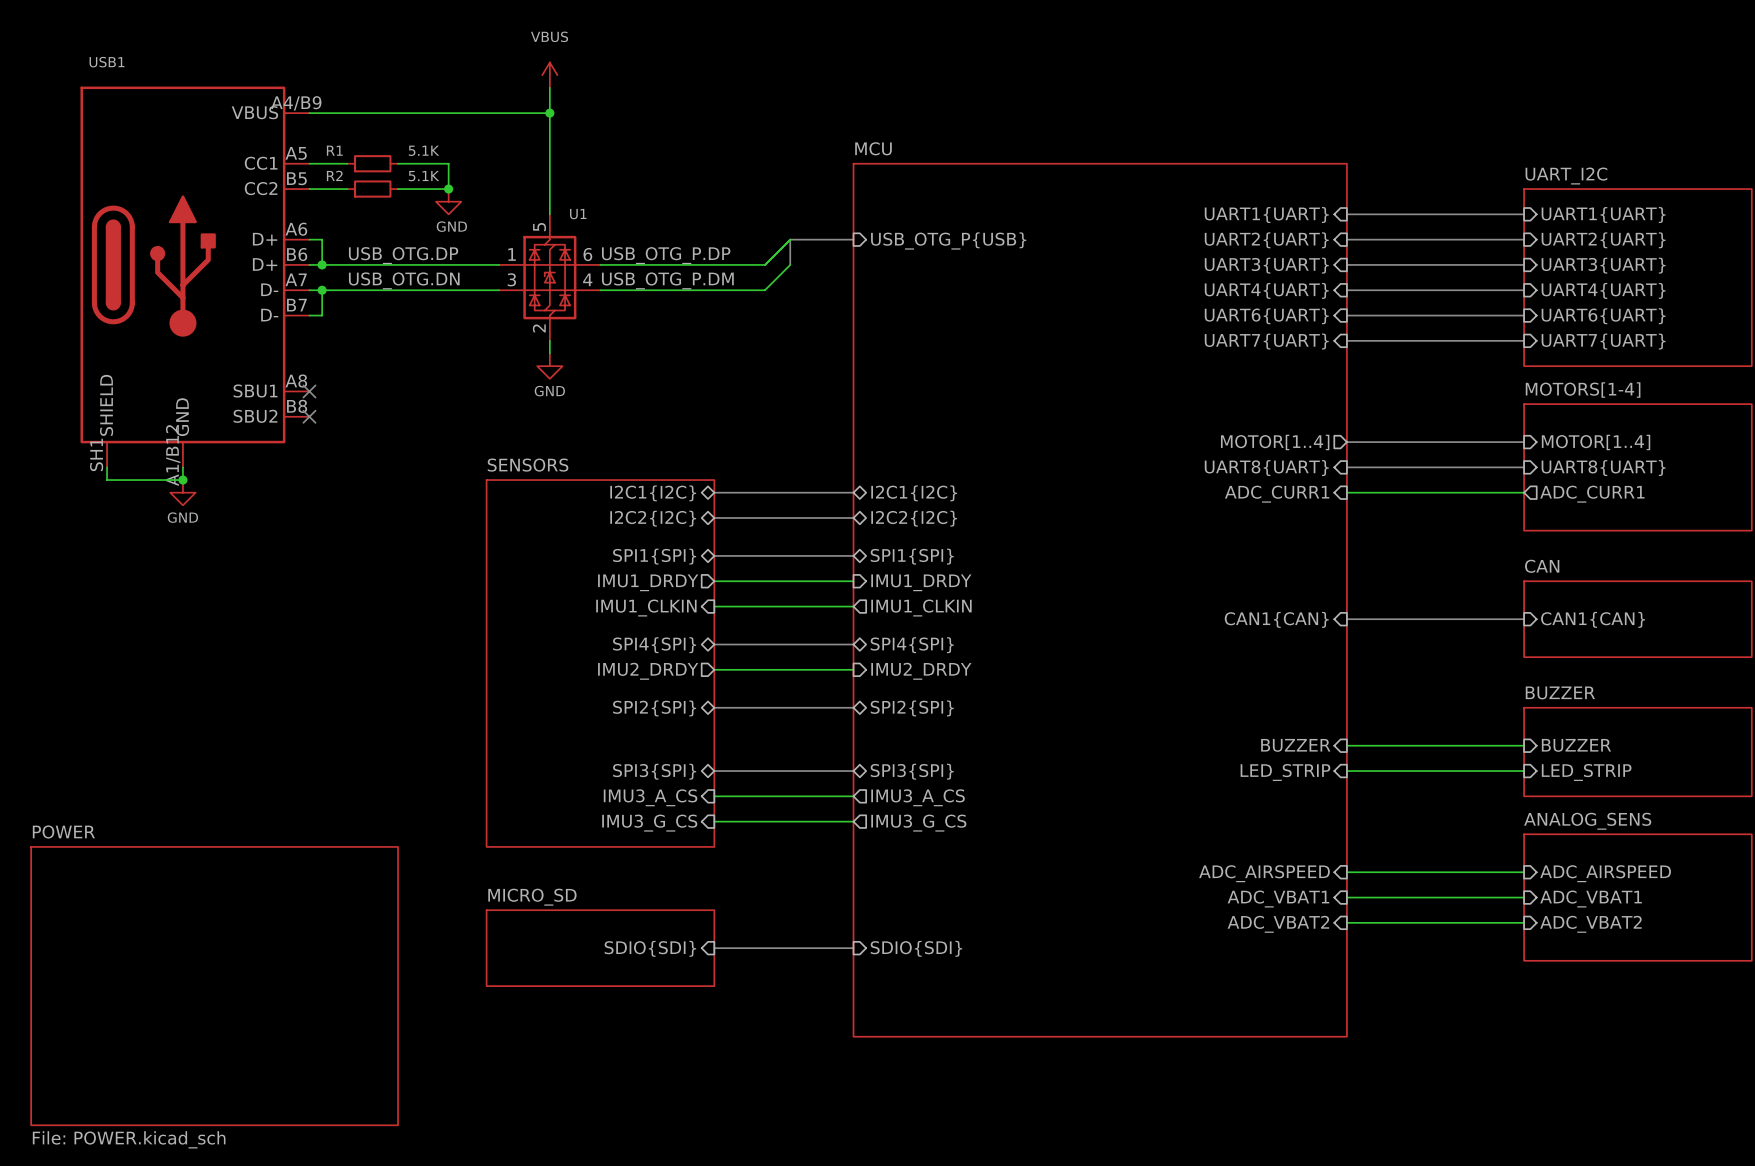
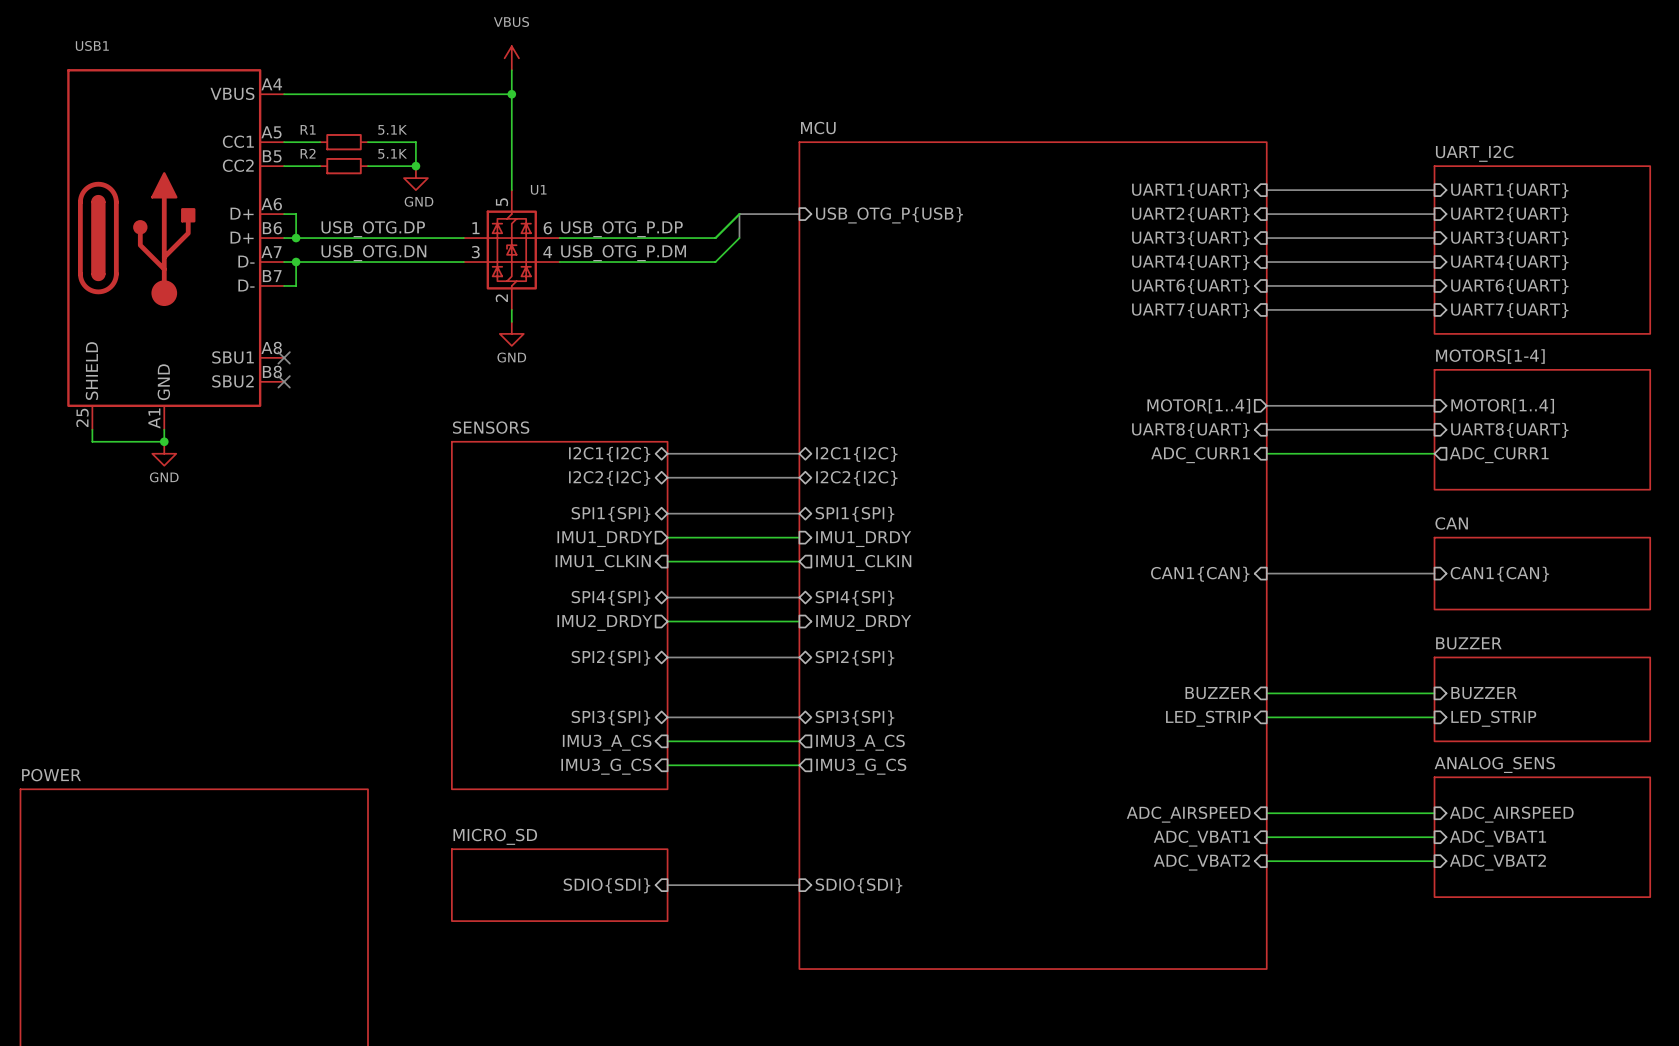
USB1 pin number: A4/B9 (296, 103) -> A4 (271, 84)
USB1 pin number: SH1 (96, 454) -> 25 (82, 417)
USB1 pin number: A1/B12 (173, 455) -> A1 (154, 418)

